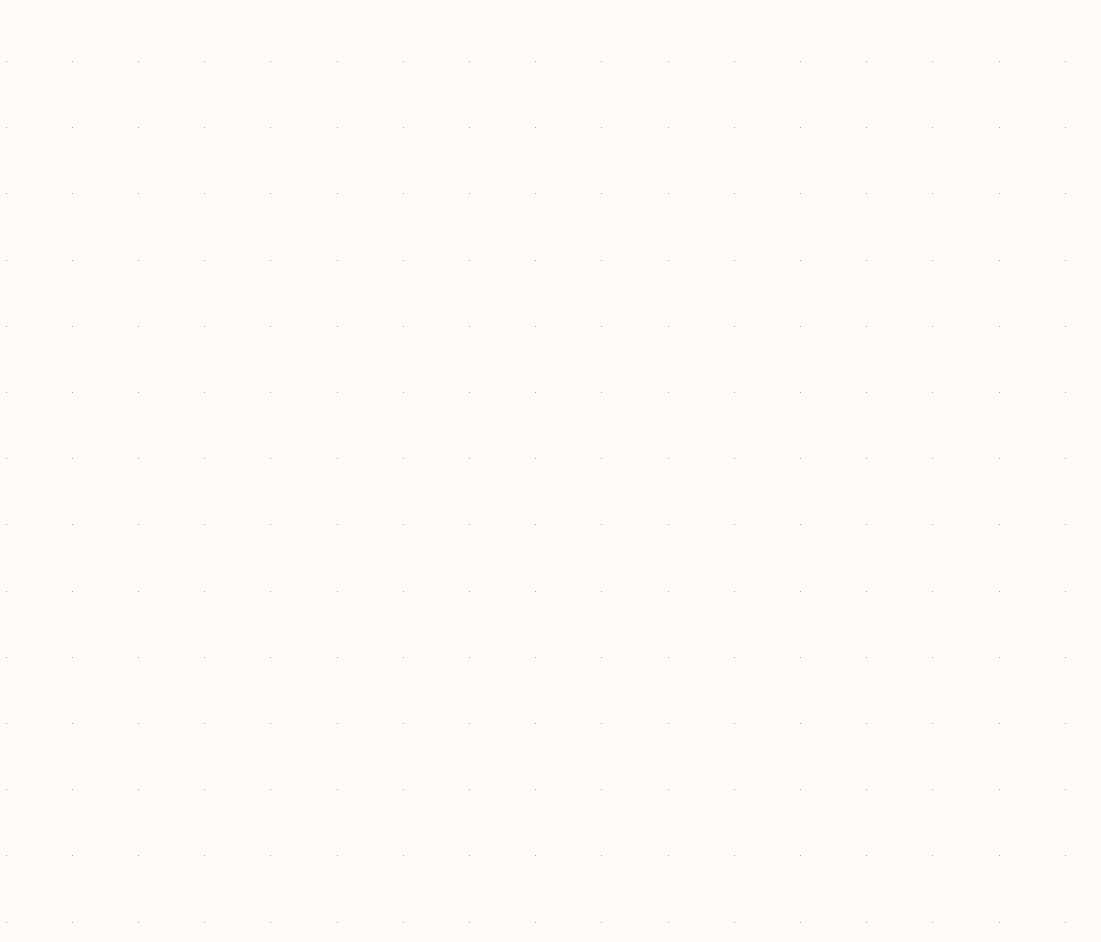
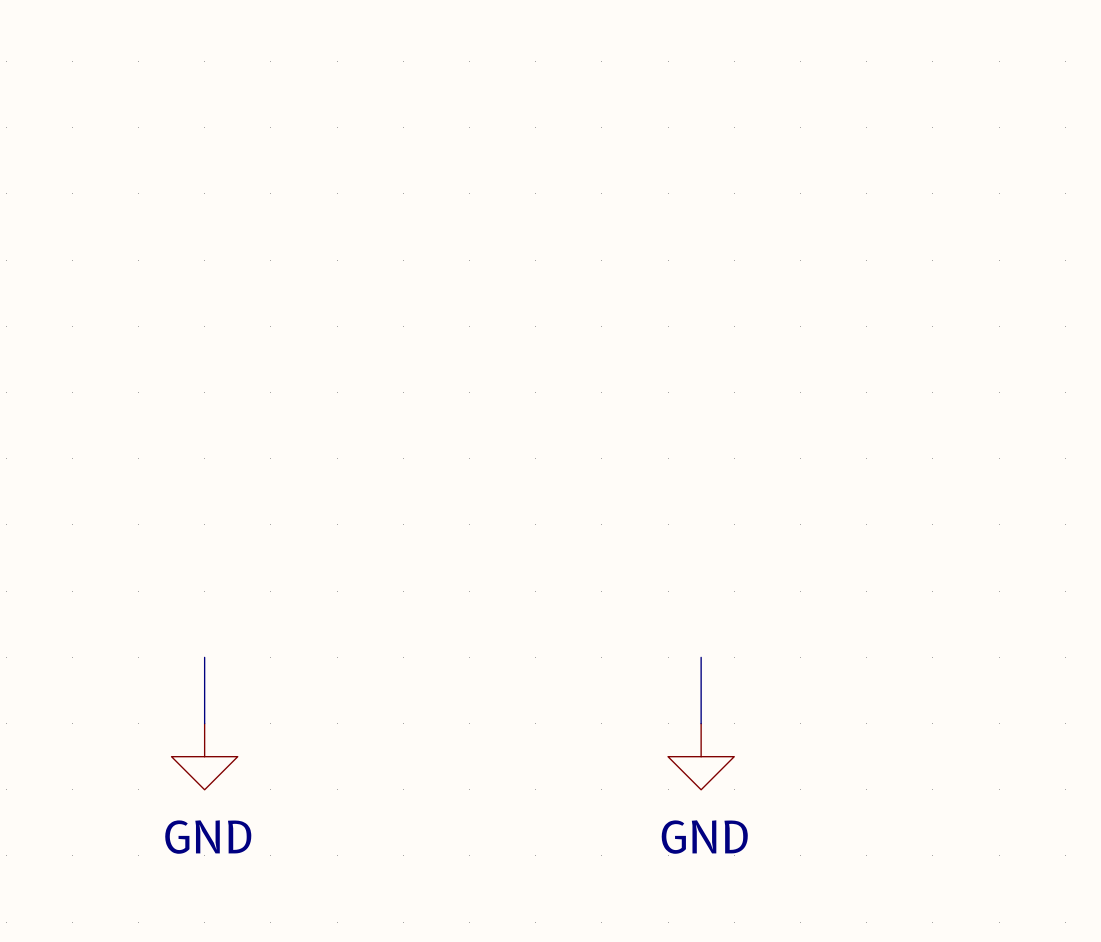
wire: none -> (204, 657) (204, 723)
wire: none -> (701, 657) (701, 723)
power symbol: none -> GND (204, 756)
power symbol: none -> GND (701, 756)

